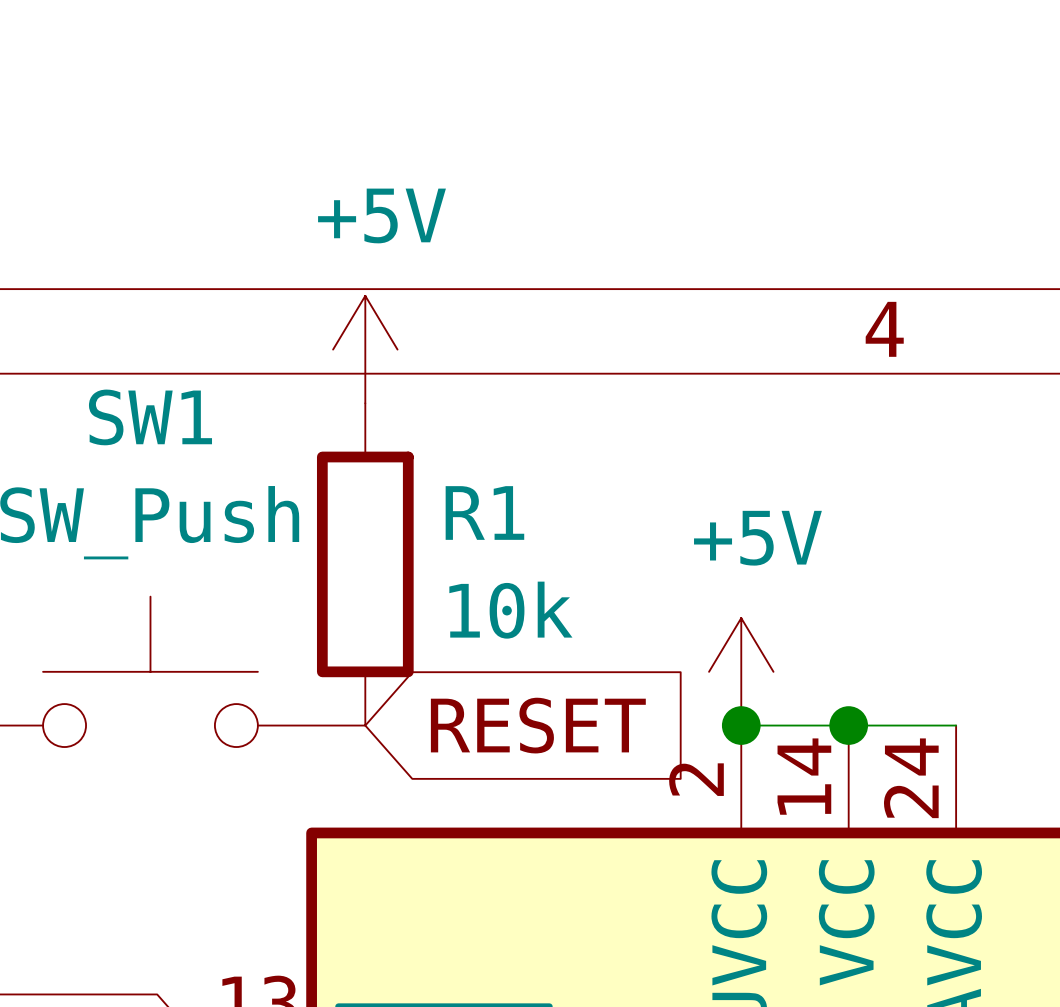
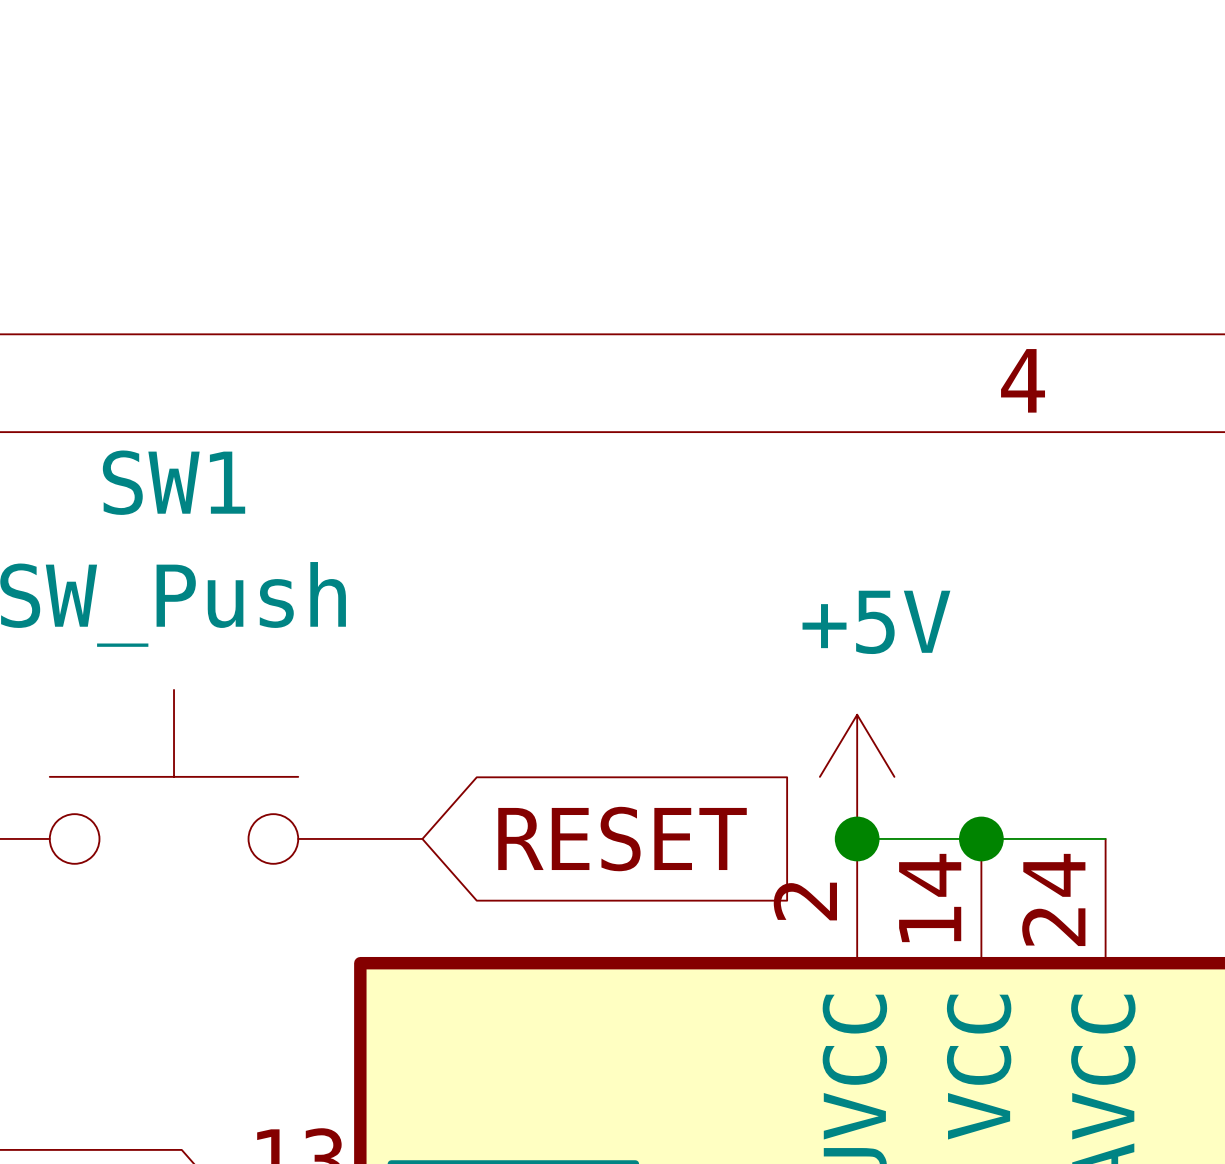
power symbol: +5V (365, 349) -> none
R1: 10k (365, 564) -> none

